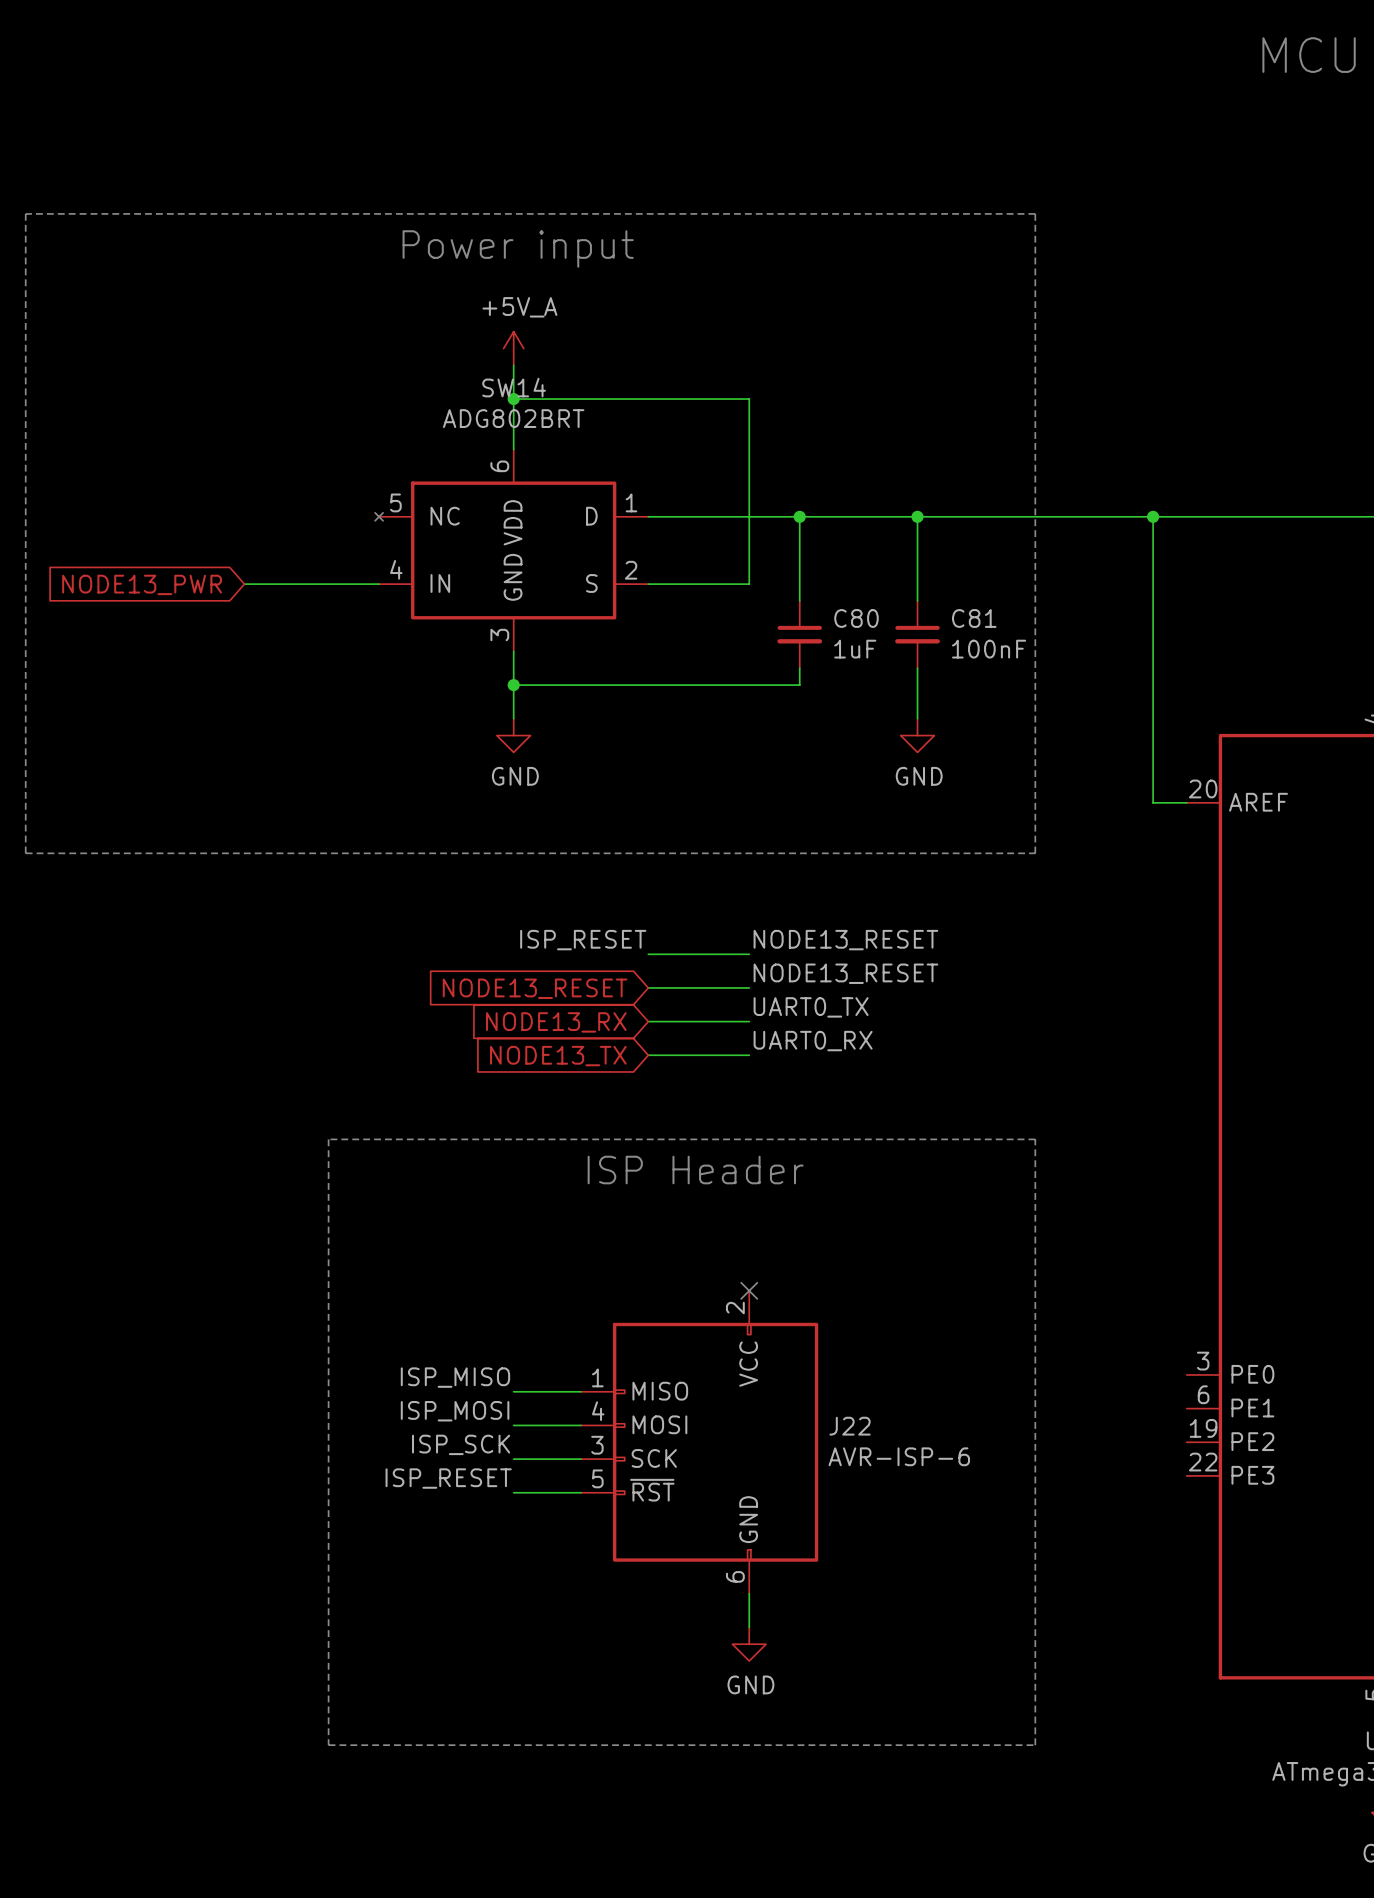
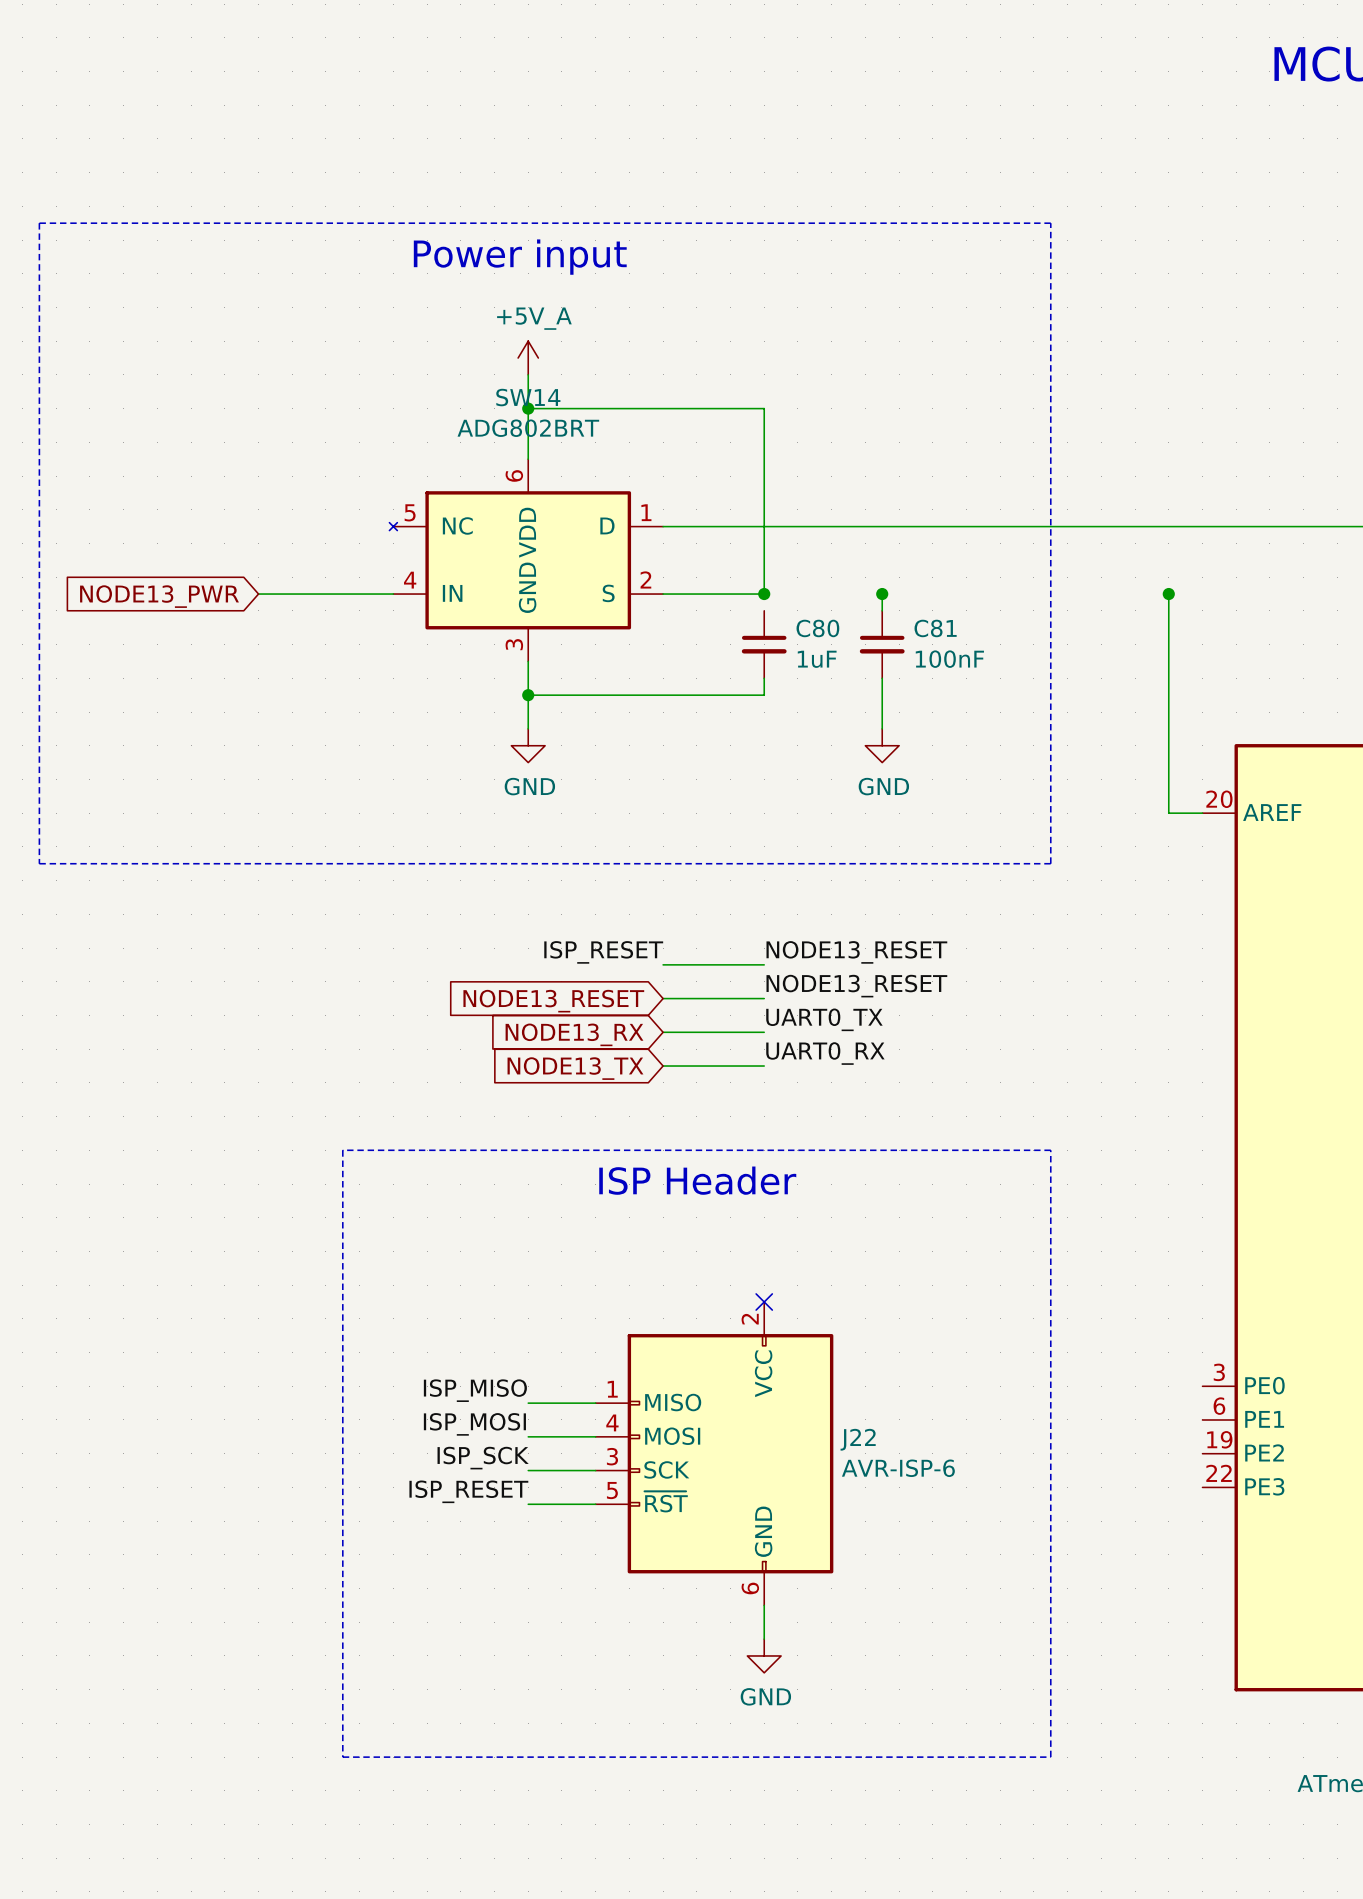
wire: (799, 516) (799, 600) -> none
junction: (799, 516) -> none
wire: (917, 516) (917, 600) -> none
junction: (917, 516) -> none
wire: (1153, 516) (1153, 584) -> none
junction position: (1153, 516) -> (1168, 594)
junction: none -> (764, 594)
wire: none -> (882, 594) (882, 610)
junction: none -> (882, 594)
C80 position: (799, 634) -> (764, 644)
C81 position: (917, 634) -> (882, 644)
wire: (799, 668) (799, 685) (749, 685) -> (764, 678) (764, 695)
wire: (917, 668) (917, 718) -> (882, 678) (882, 728)
power symbol position: GND (917, 735) -> GND (882, 745)

